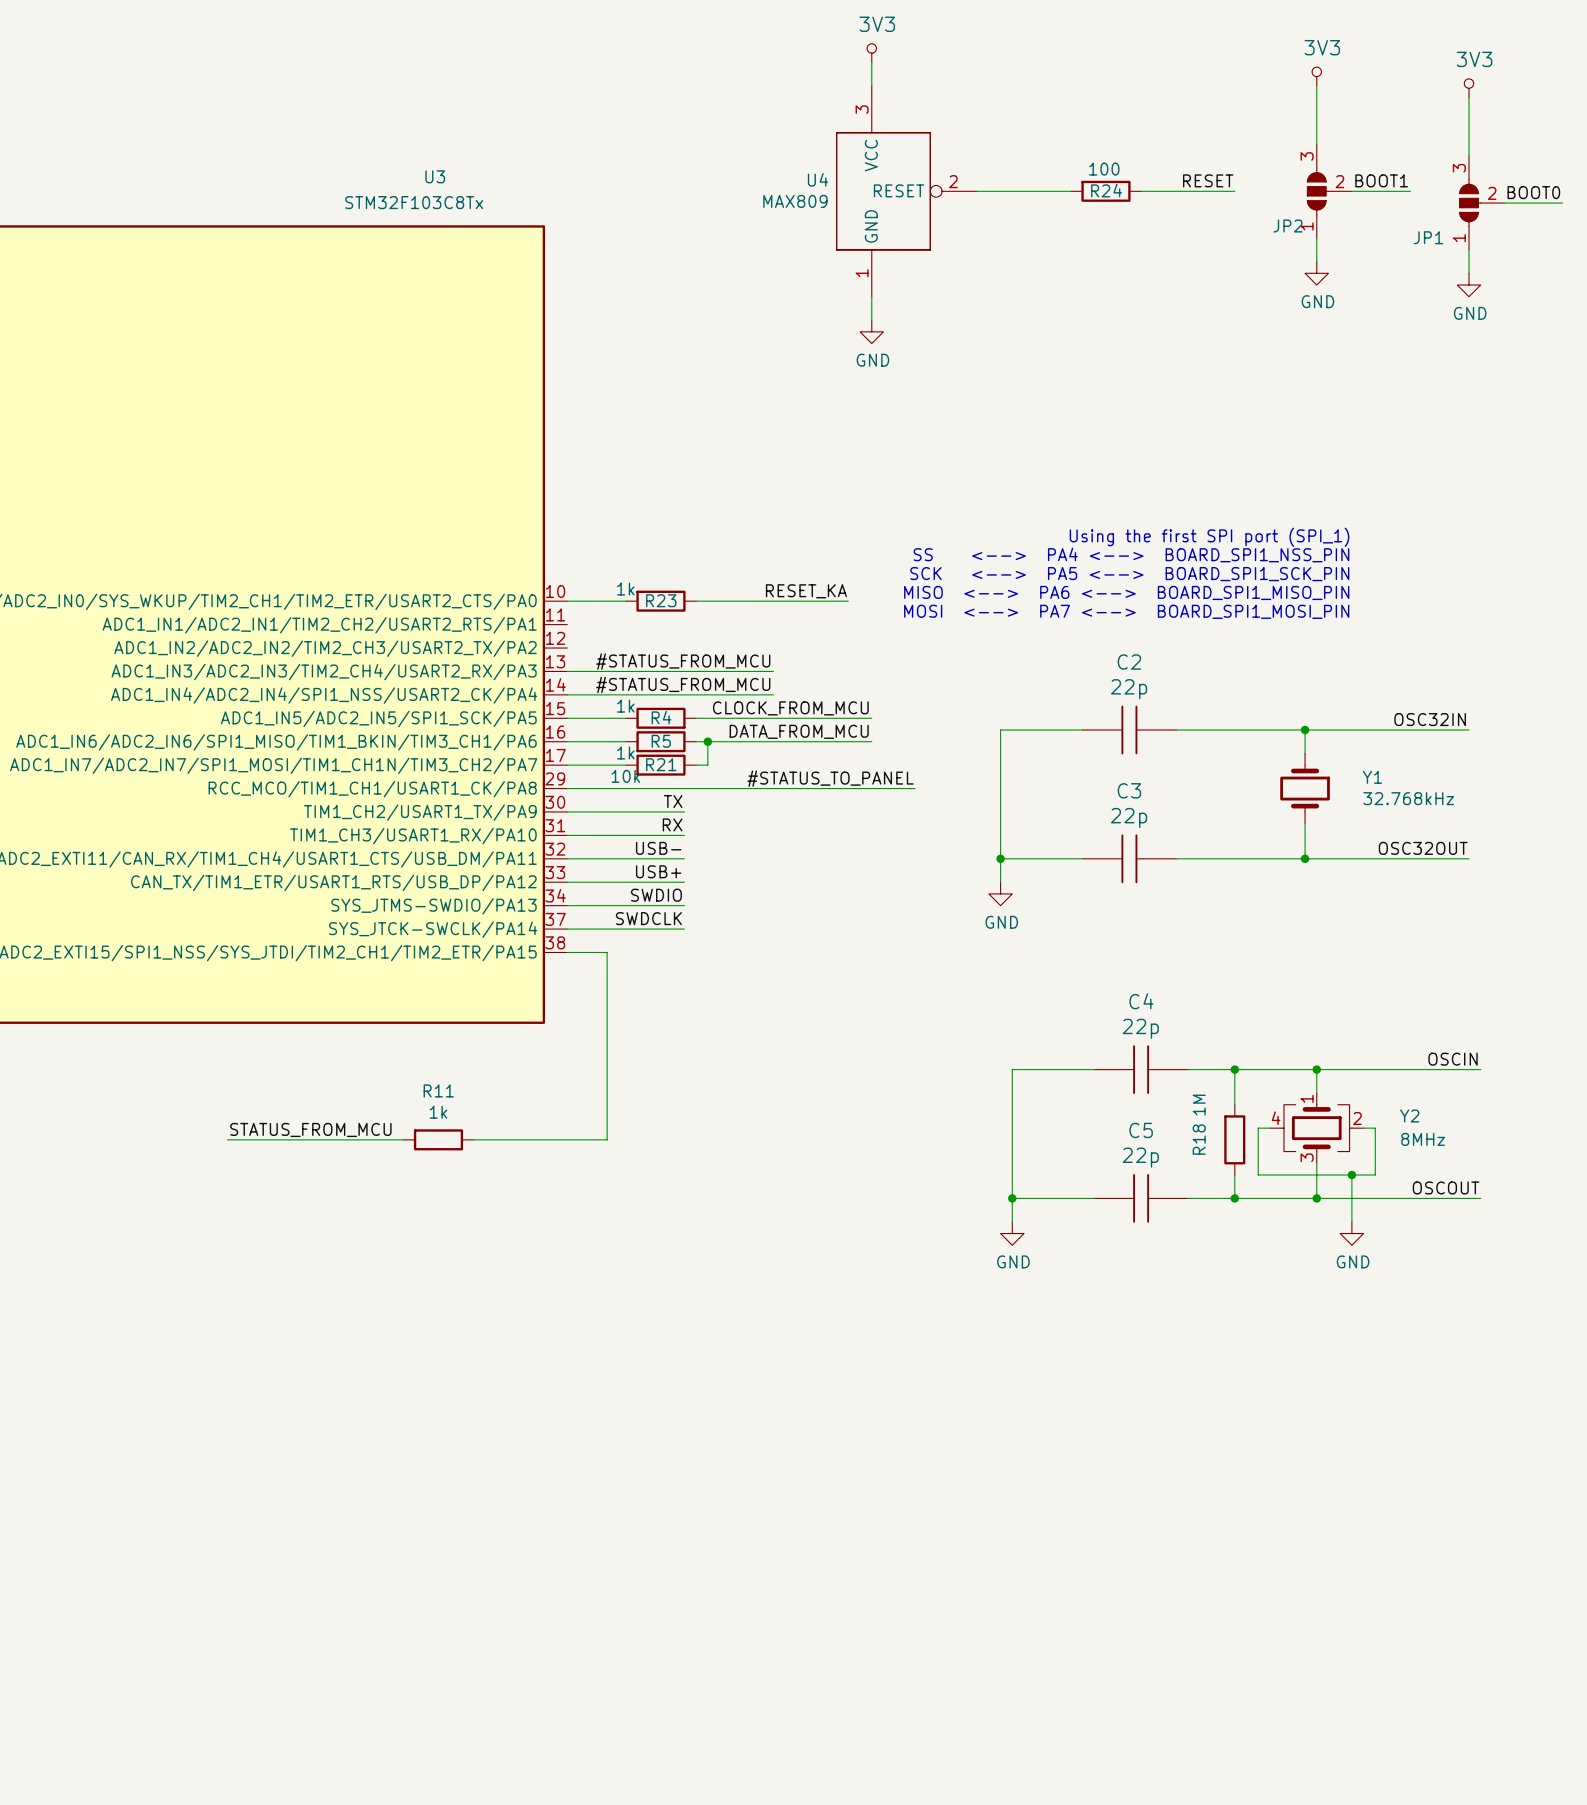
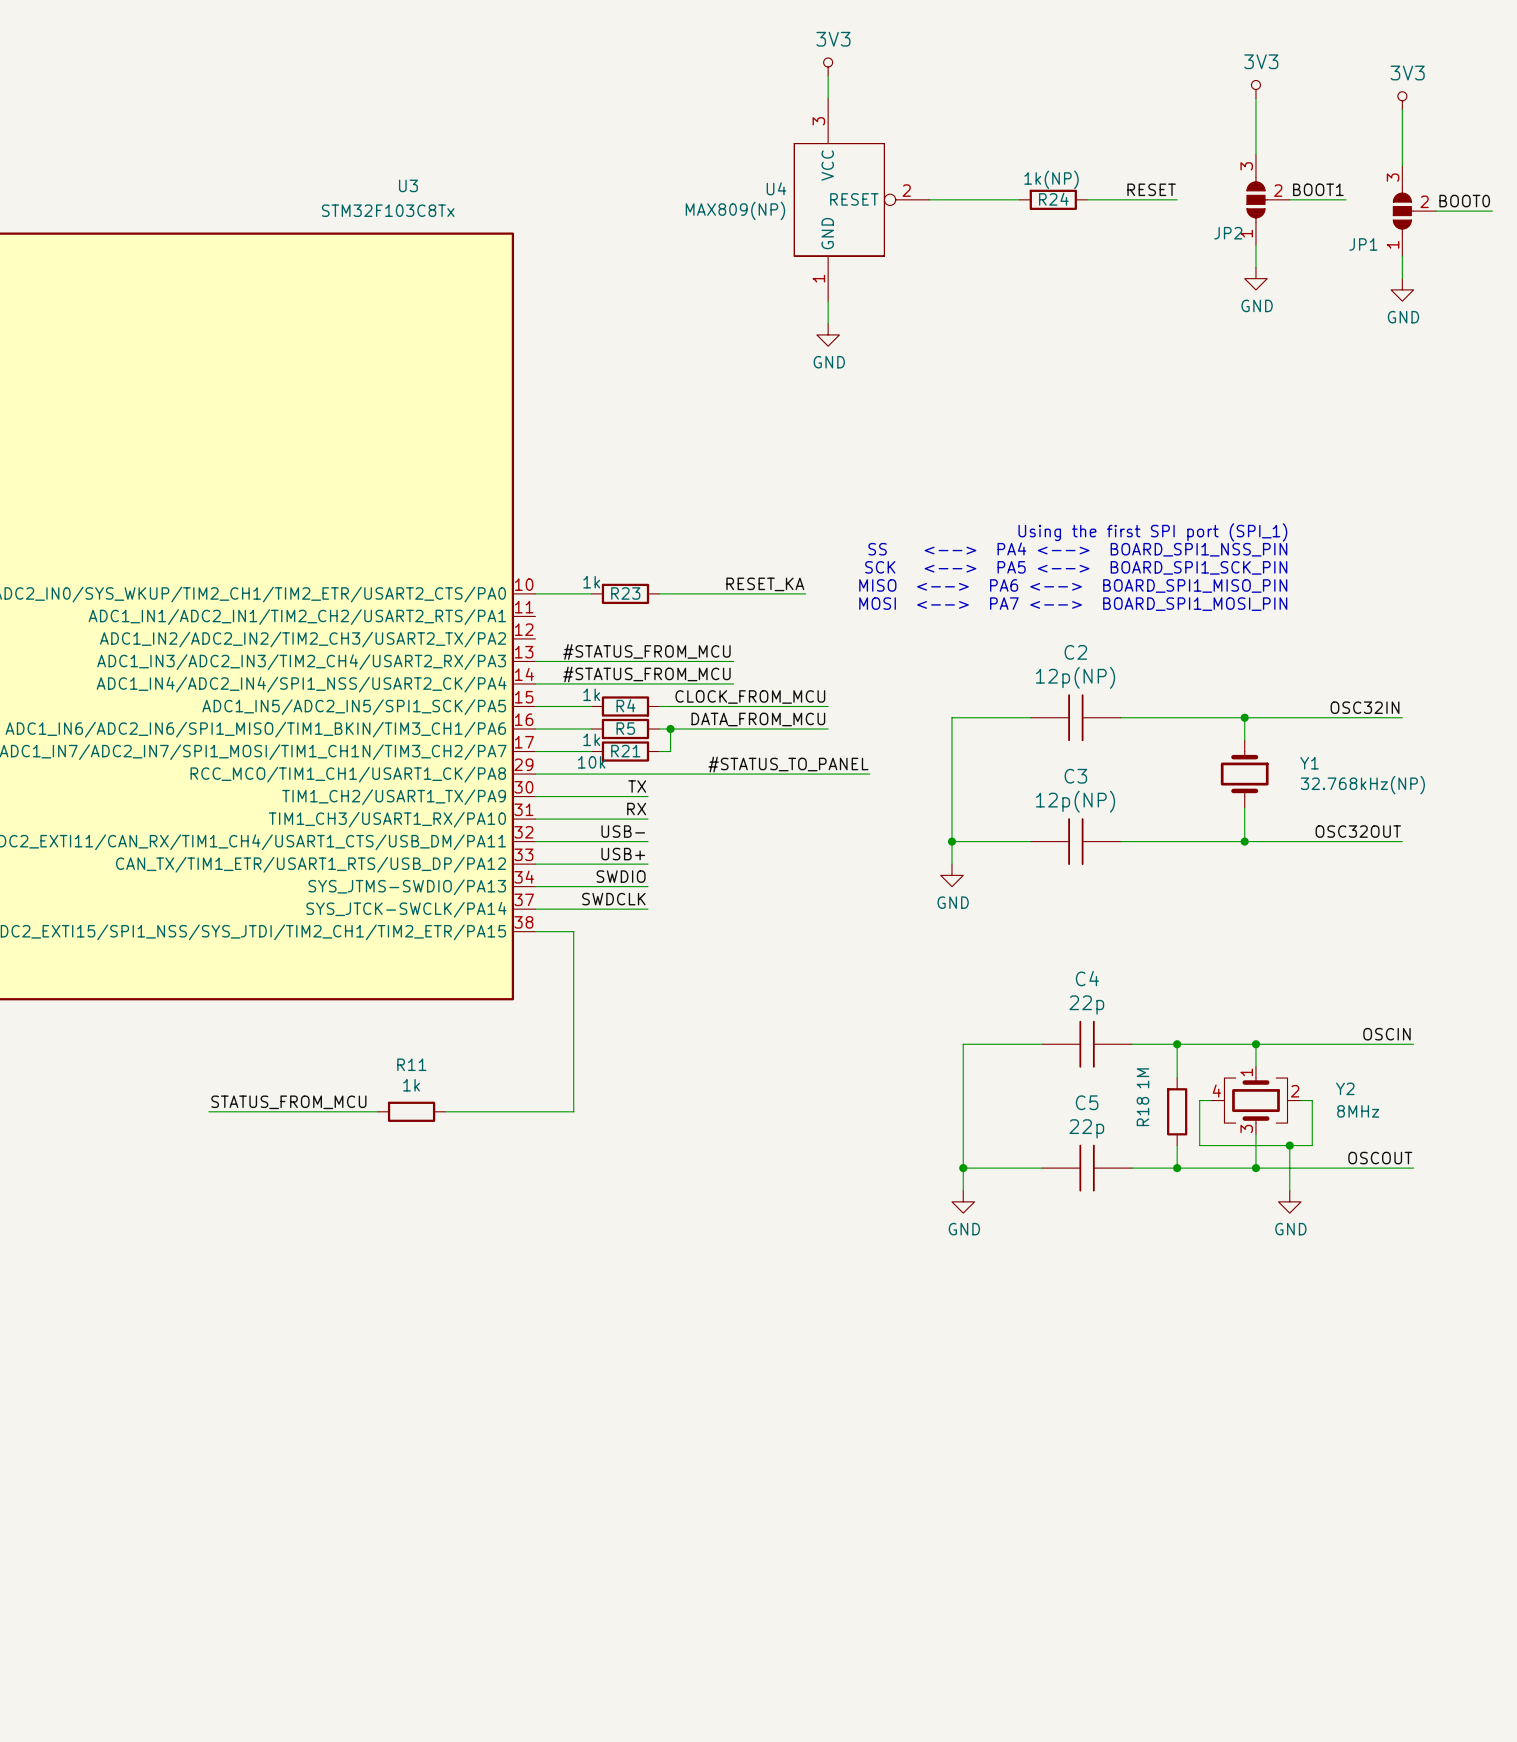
R24 value: 100 (1104, 169) -> 1k(NP) (1051, 179)
U4 value: MAX809 (795, 201) -> MAX809(NP) (735, 210)
C2 value: 22p (1129, 689) -> 12p(NP) (1075, 677)
Y1 value: 32.768kHz (1408, 798) -> 32.768kHz(NP) (1362, 785)
C3 value: 22p (1129, 818) -> 12p(NP) (1075, 801)

